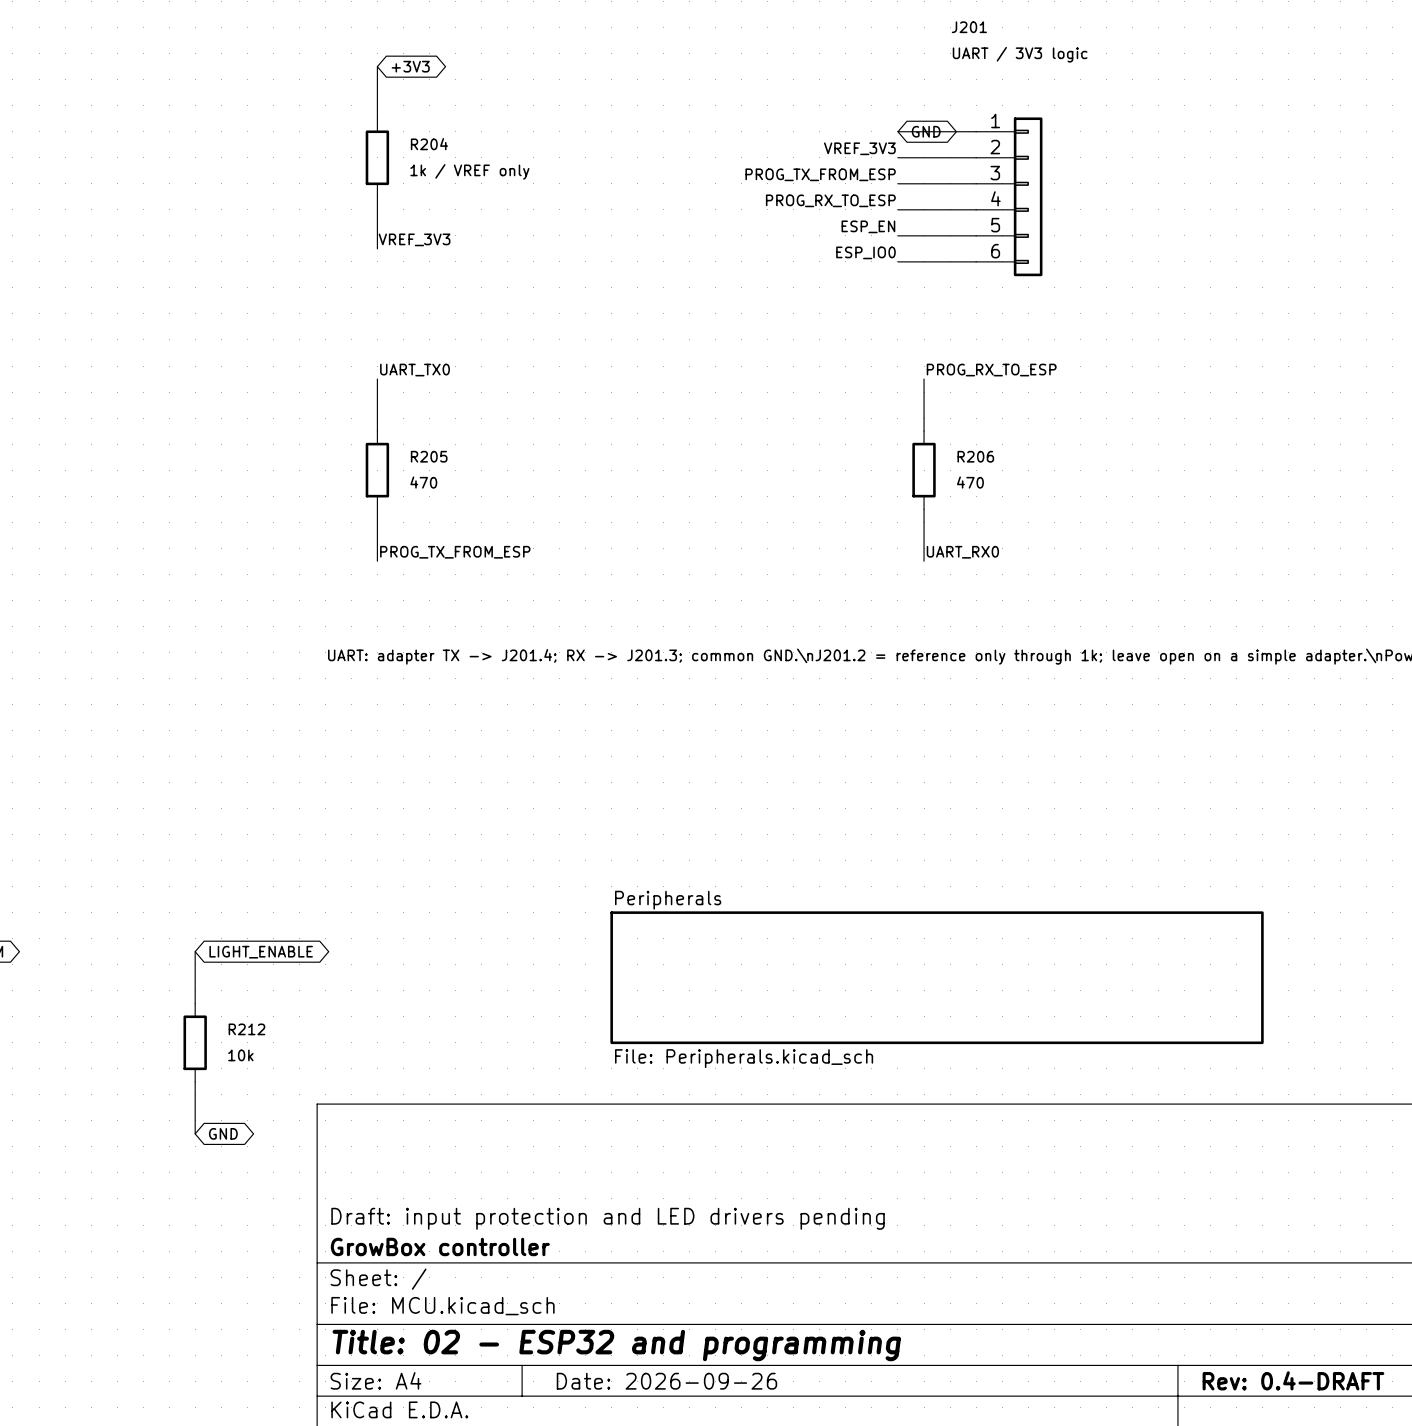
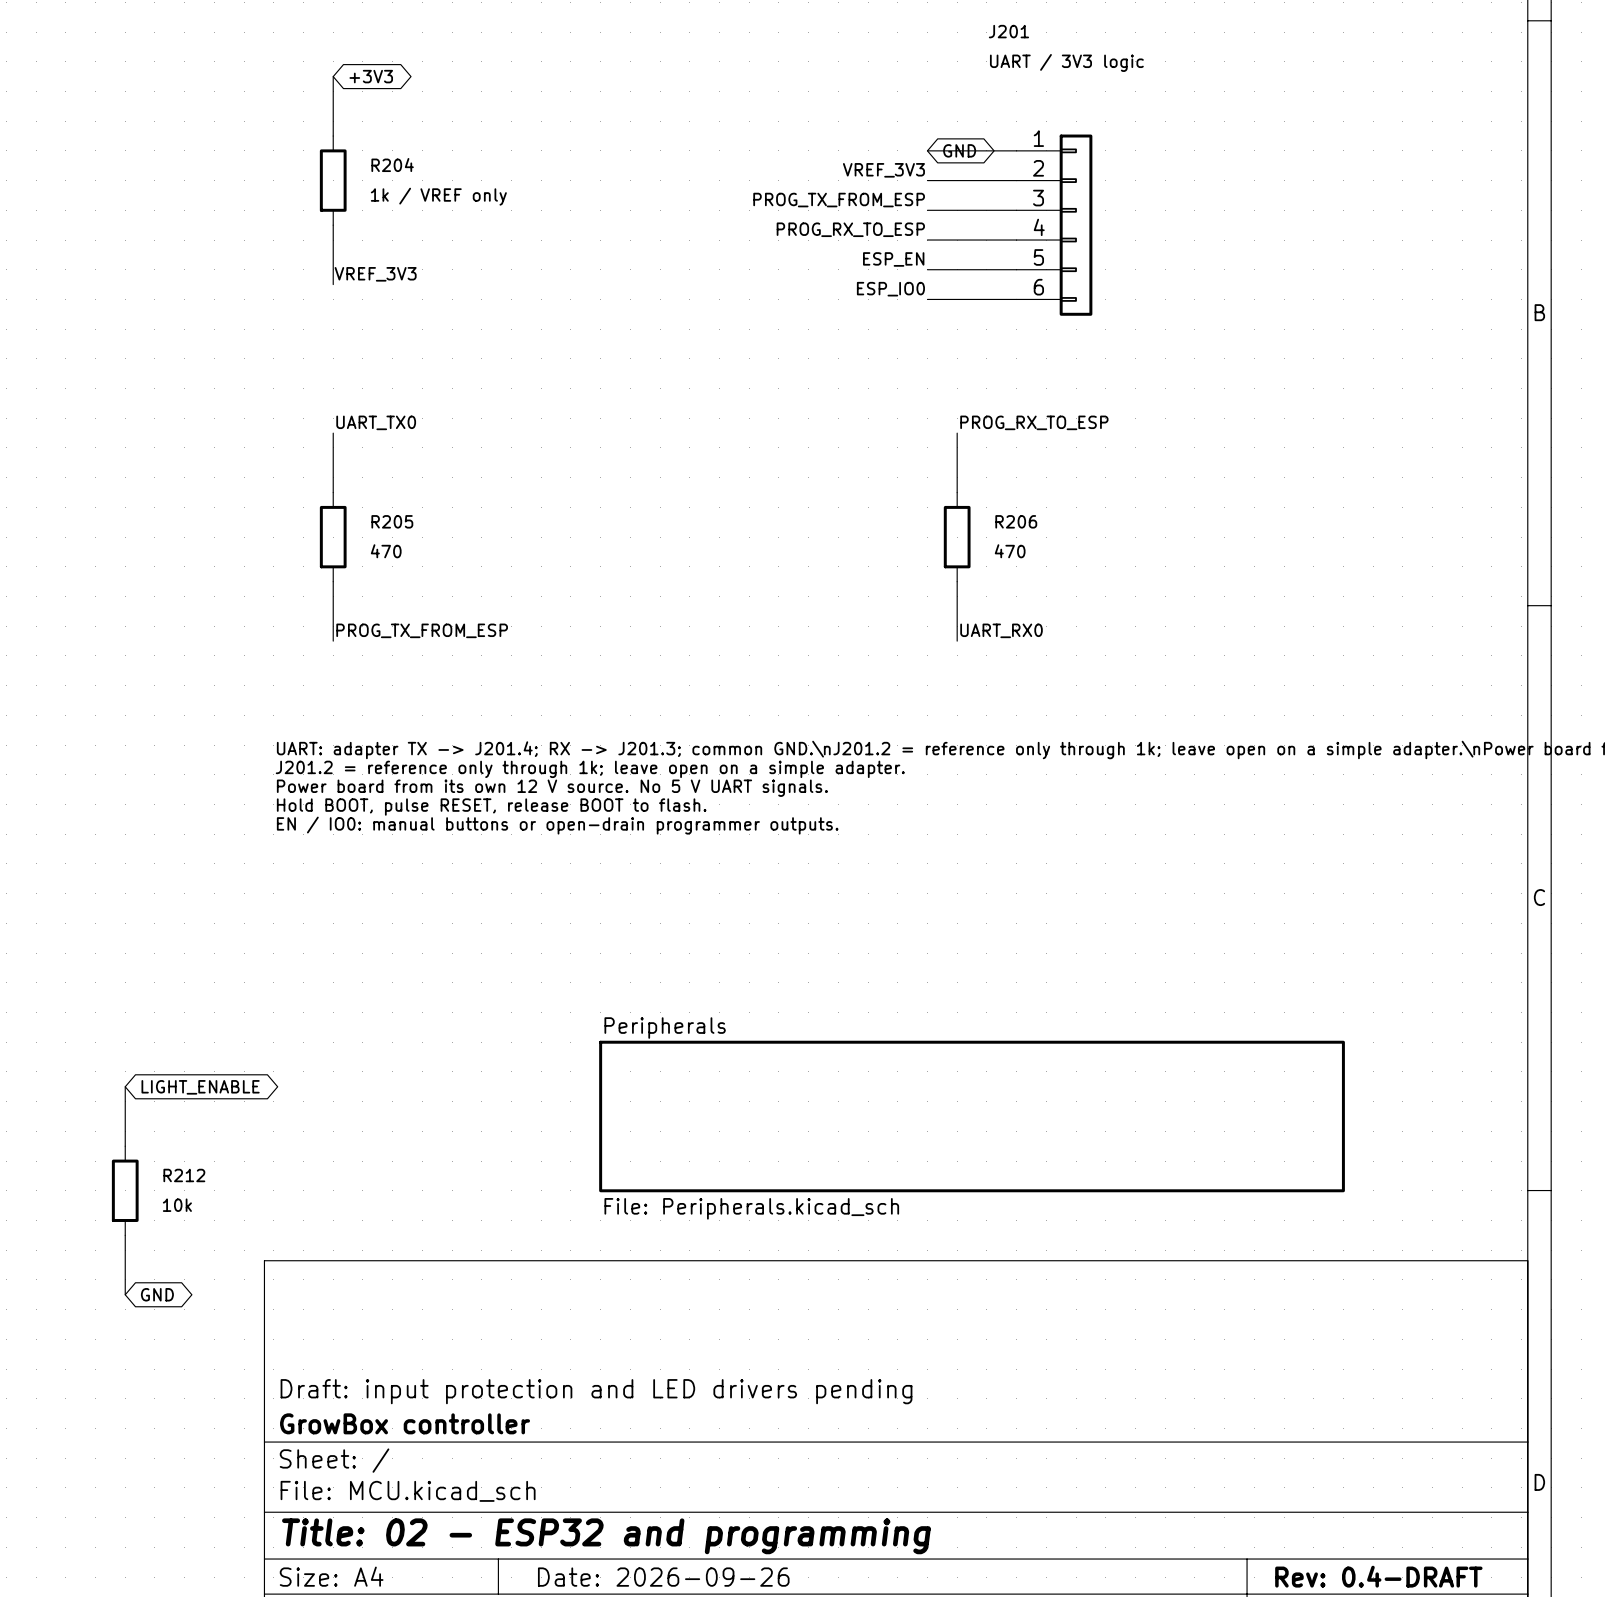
text: none -> J201.2 = reference only through 1k; leave open on a simple adapter. (590, 769)
text: none -> Power board from its own 12 V source. No 5 V UART signals. (552, 788)
text: none -> Hold BOOT, pulse RESET, release BOOT to flash. (491, 807)
text: none -> EN / IO0: manual buttons or open-drain programmer outputs. (557, 825)

